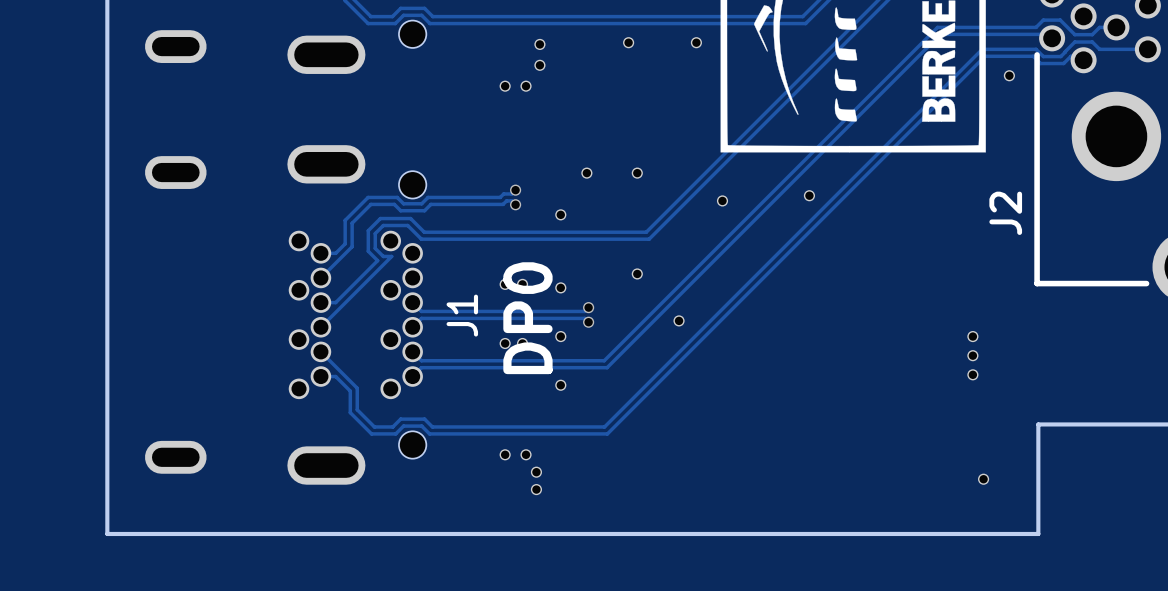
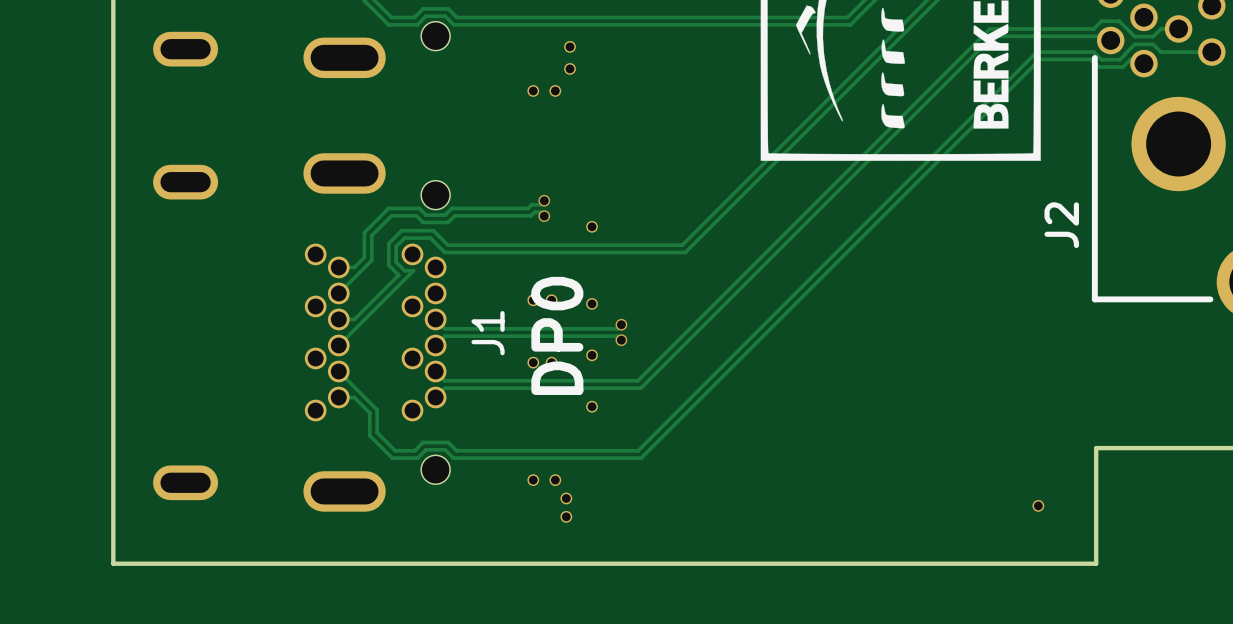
part: (628, 42) -> none
part: (696, 42) -> none
part: (1009, 75) -> none
part: (586, 173) -> none
part: (637, 173) -> none
part: (809, 195) -> none
part: (722, 200) -> none
part: (637, 273) -> none
part: (679, 320) -> none
part: (972, 336) -> none
part: (972, 355) -> none
part: (972, 374) -> none

